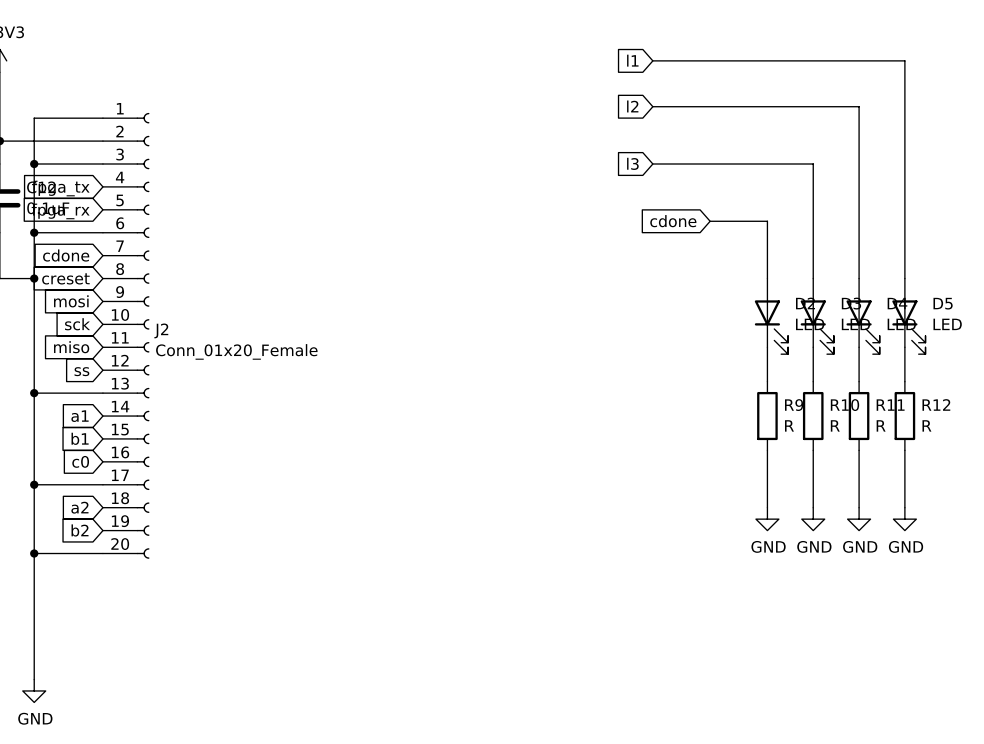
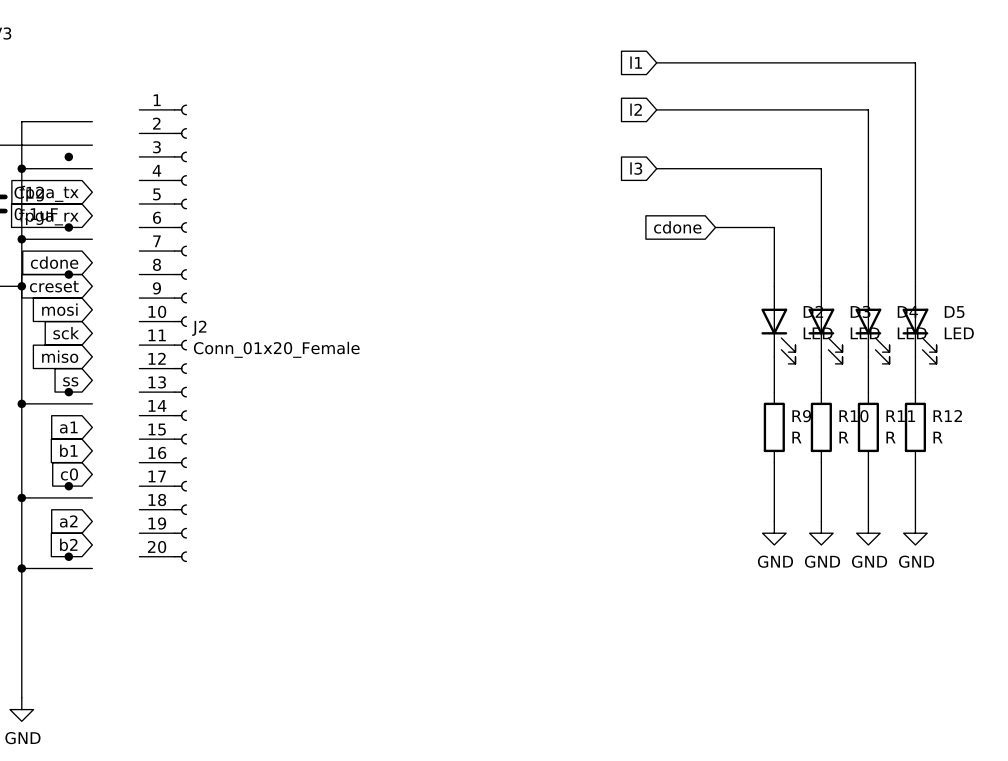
junction: none -> (68, 156)
junction: none -> (68, 227)
junction: none -> (68, 274)
J2 position: (126, 335) -> (163, 333)
junction: none -> (68, 392)
junction: none -> (68, 486)
junction: none -> (68, 556)

